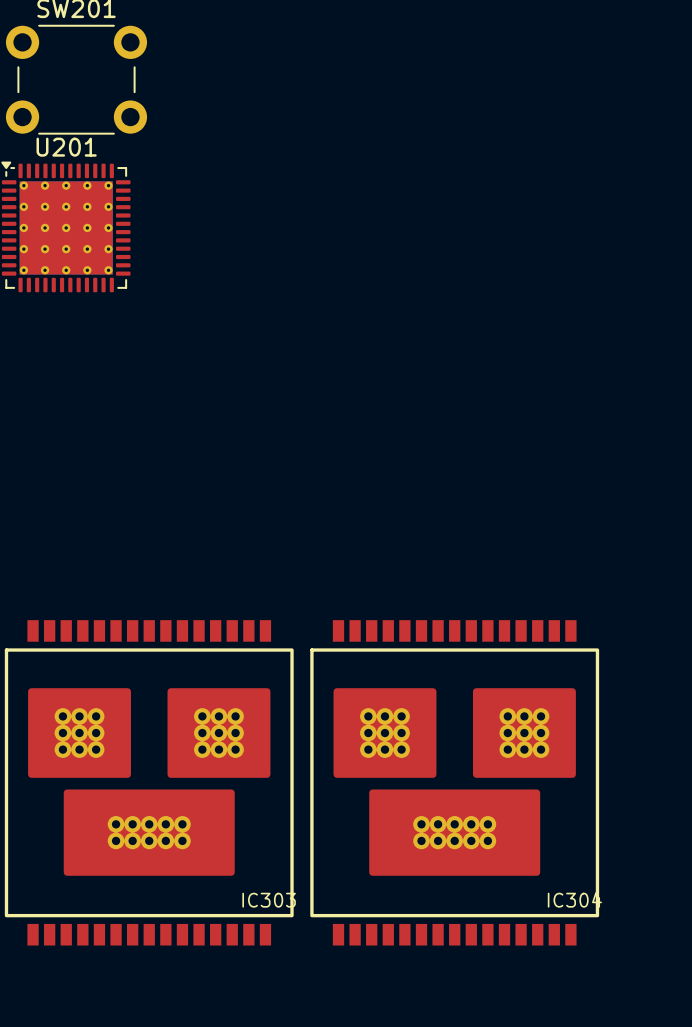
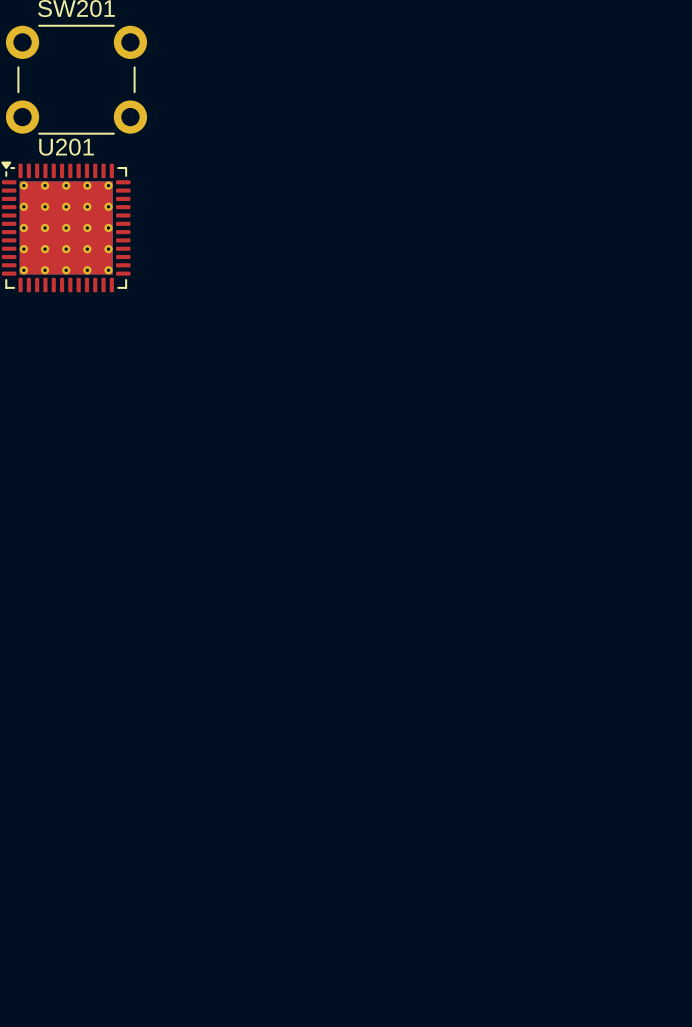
IC303: (149, 782) -> none
IC304: (454, 782) -> none

